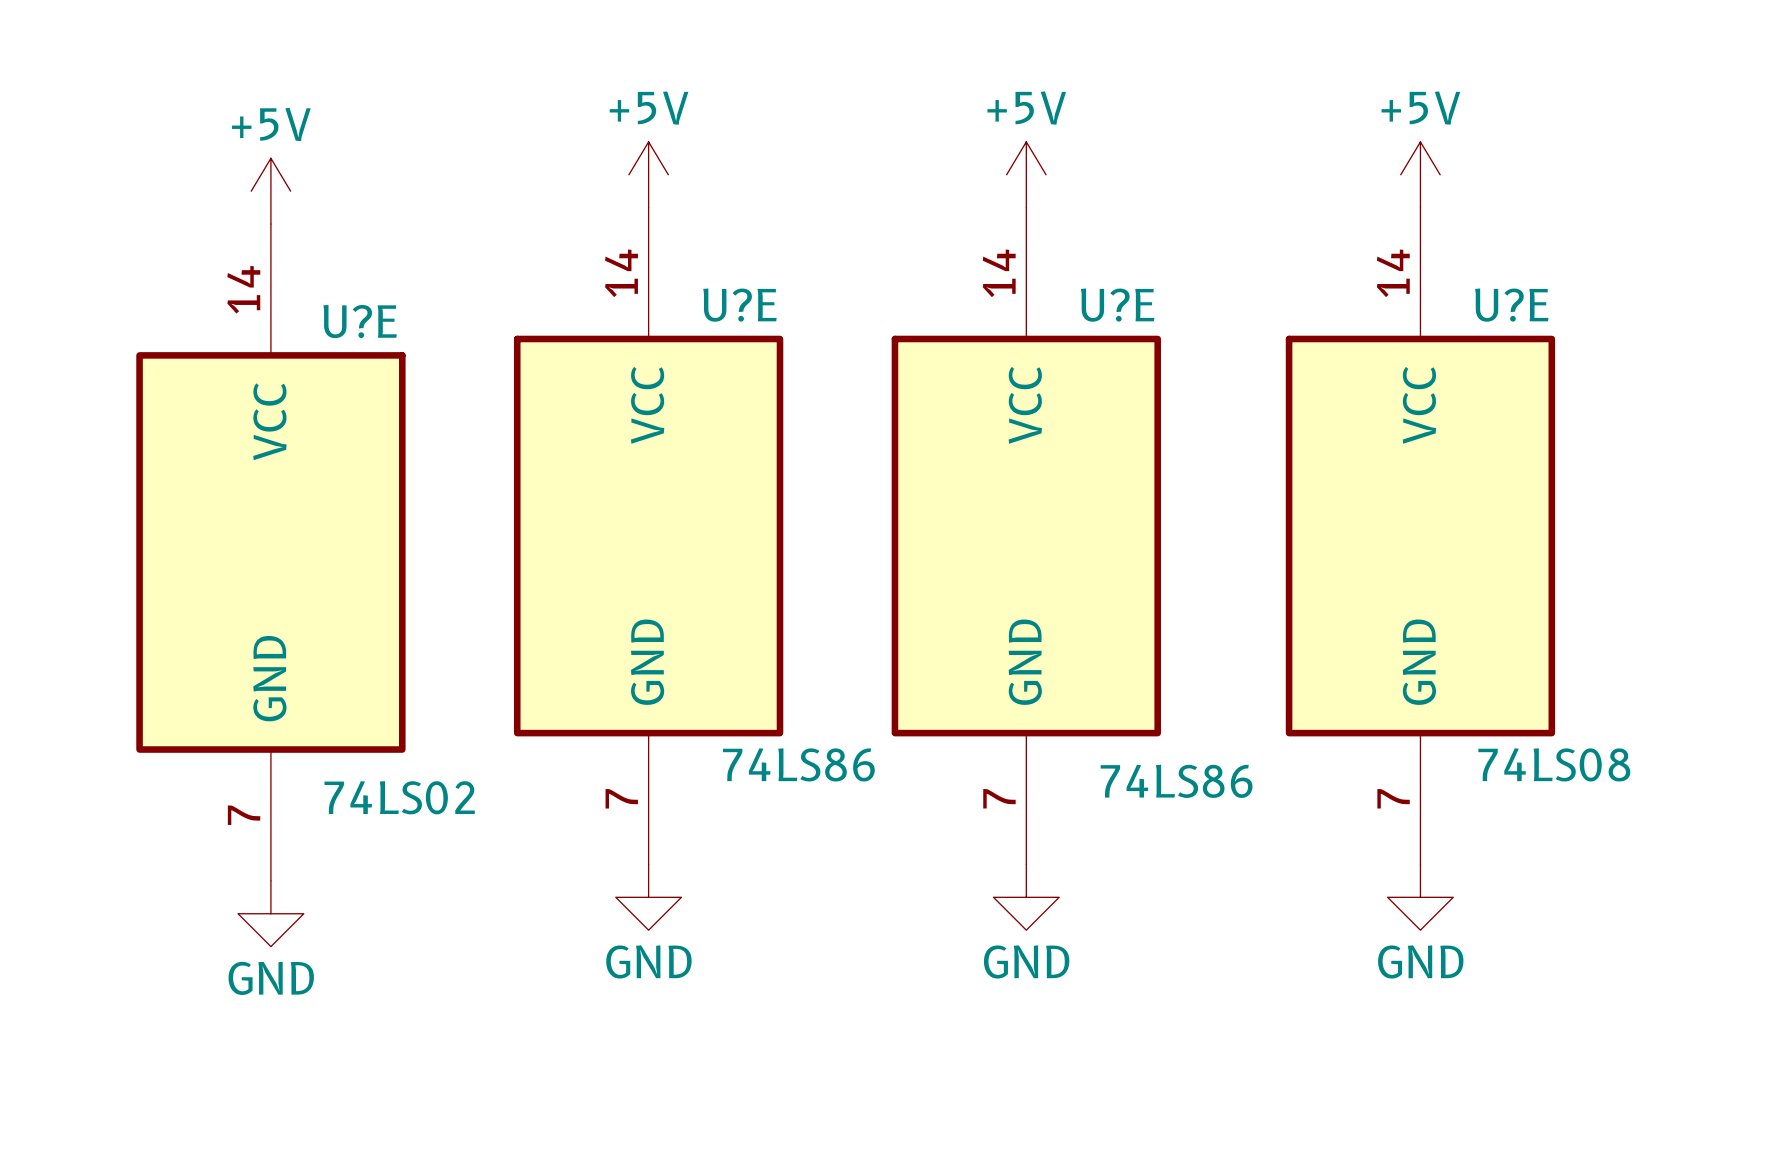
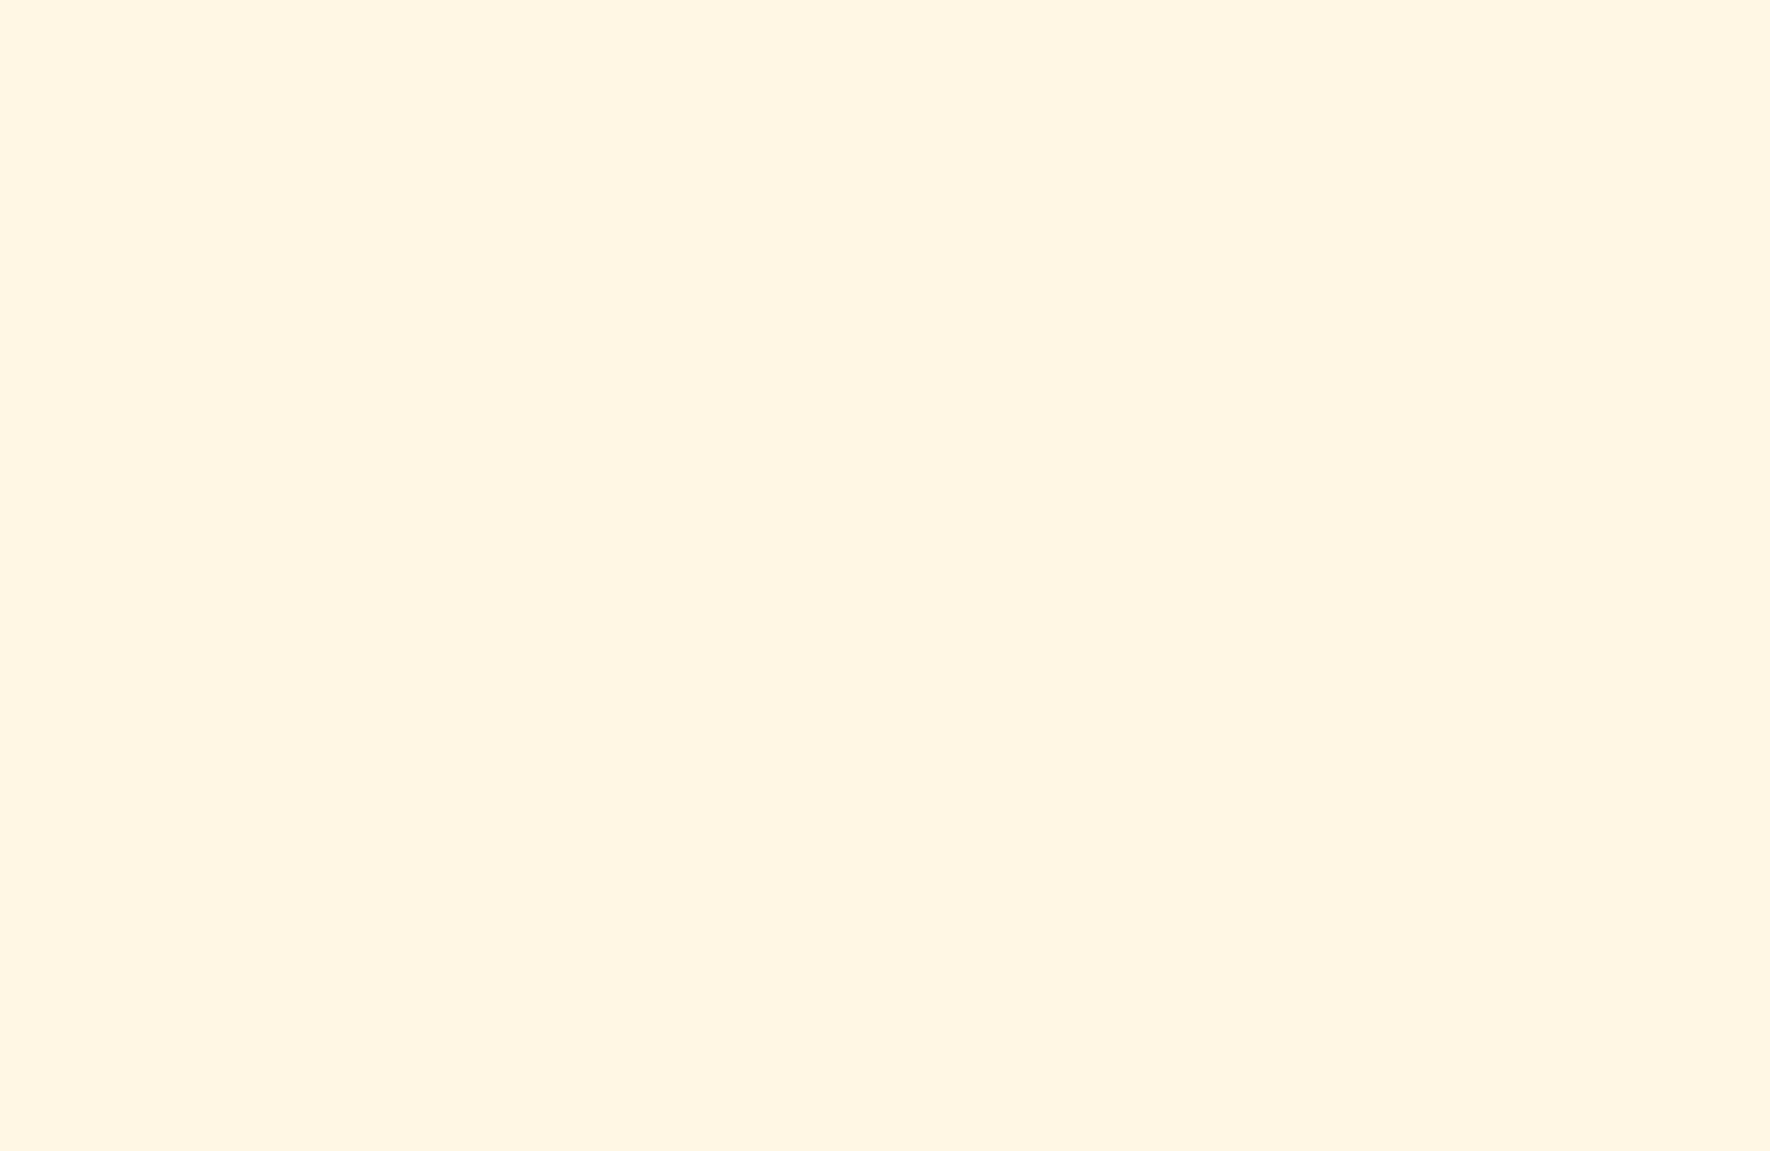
power symbol: +5V (648, 174) -> none
power symbol: +5V (1026, 174) -> none
power symbol: +5V (1420, 174) -> none
power symbol: +5V (270, 191) -> none
U?E: 74LS86 (648, 536) -> none
U?E: 74LS86 (1026, 536) -> none
U?E: 74LS08 (1420, 536) -> none
U?E: 74LS02 (270, 552) -> none
power symbol: GND (648, 897) -> none
power symbol: GND (1026, 897) -> none
power symbol: GND (1420, 897) -> none
power symbol: GND (270, 913) -> none

